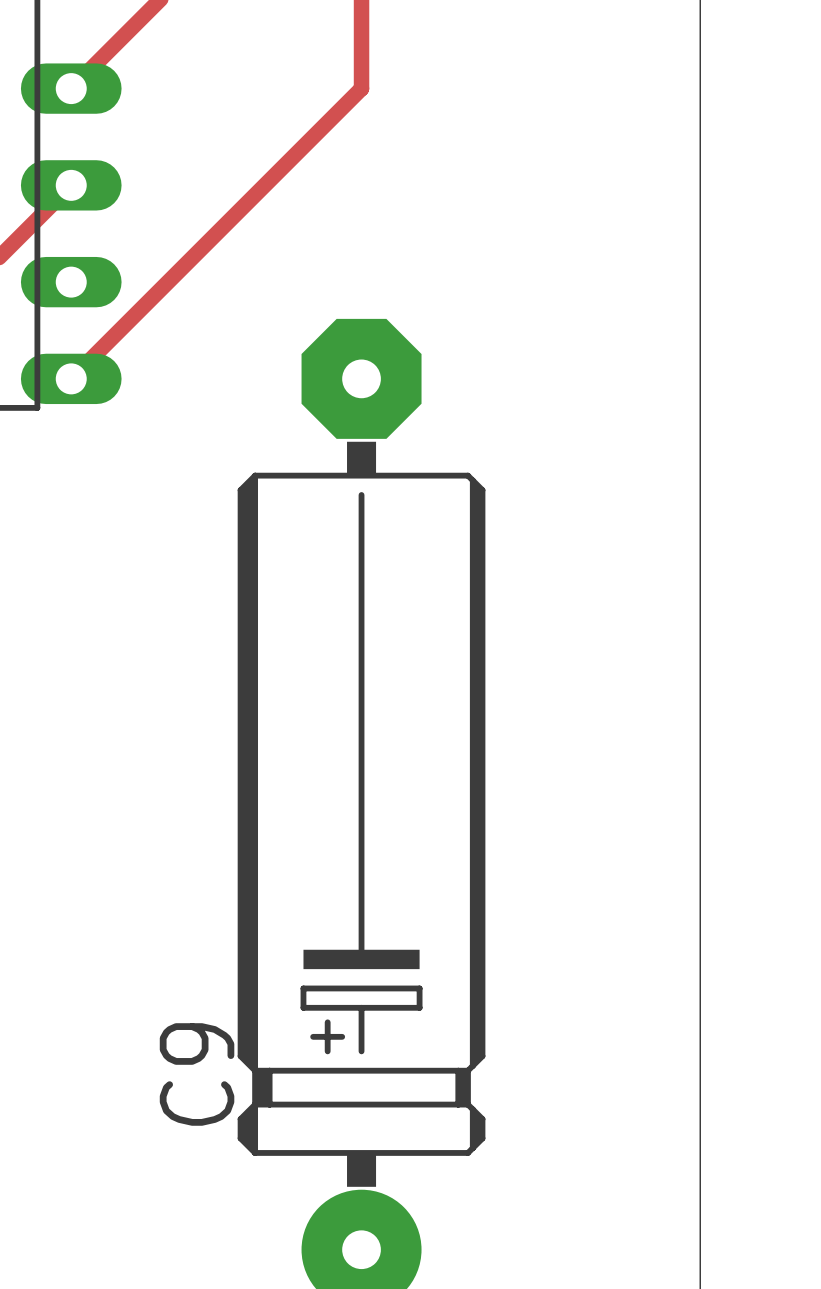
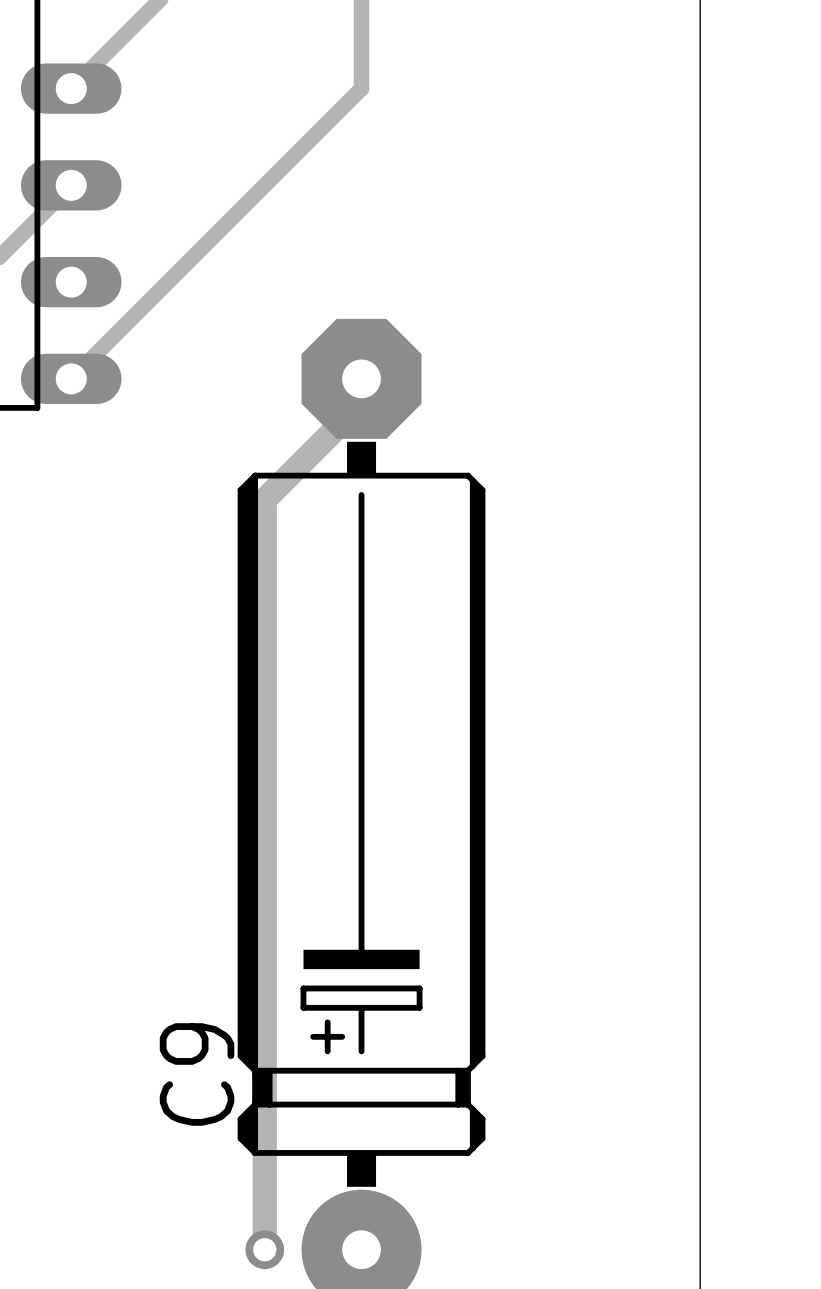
track: none -> (361, 378) (337, 427) (264, 499) (264, 1249)
via: none -> (264, 1249)

